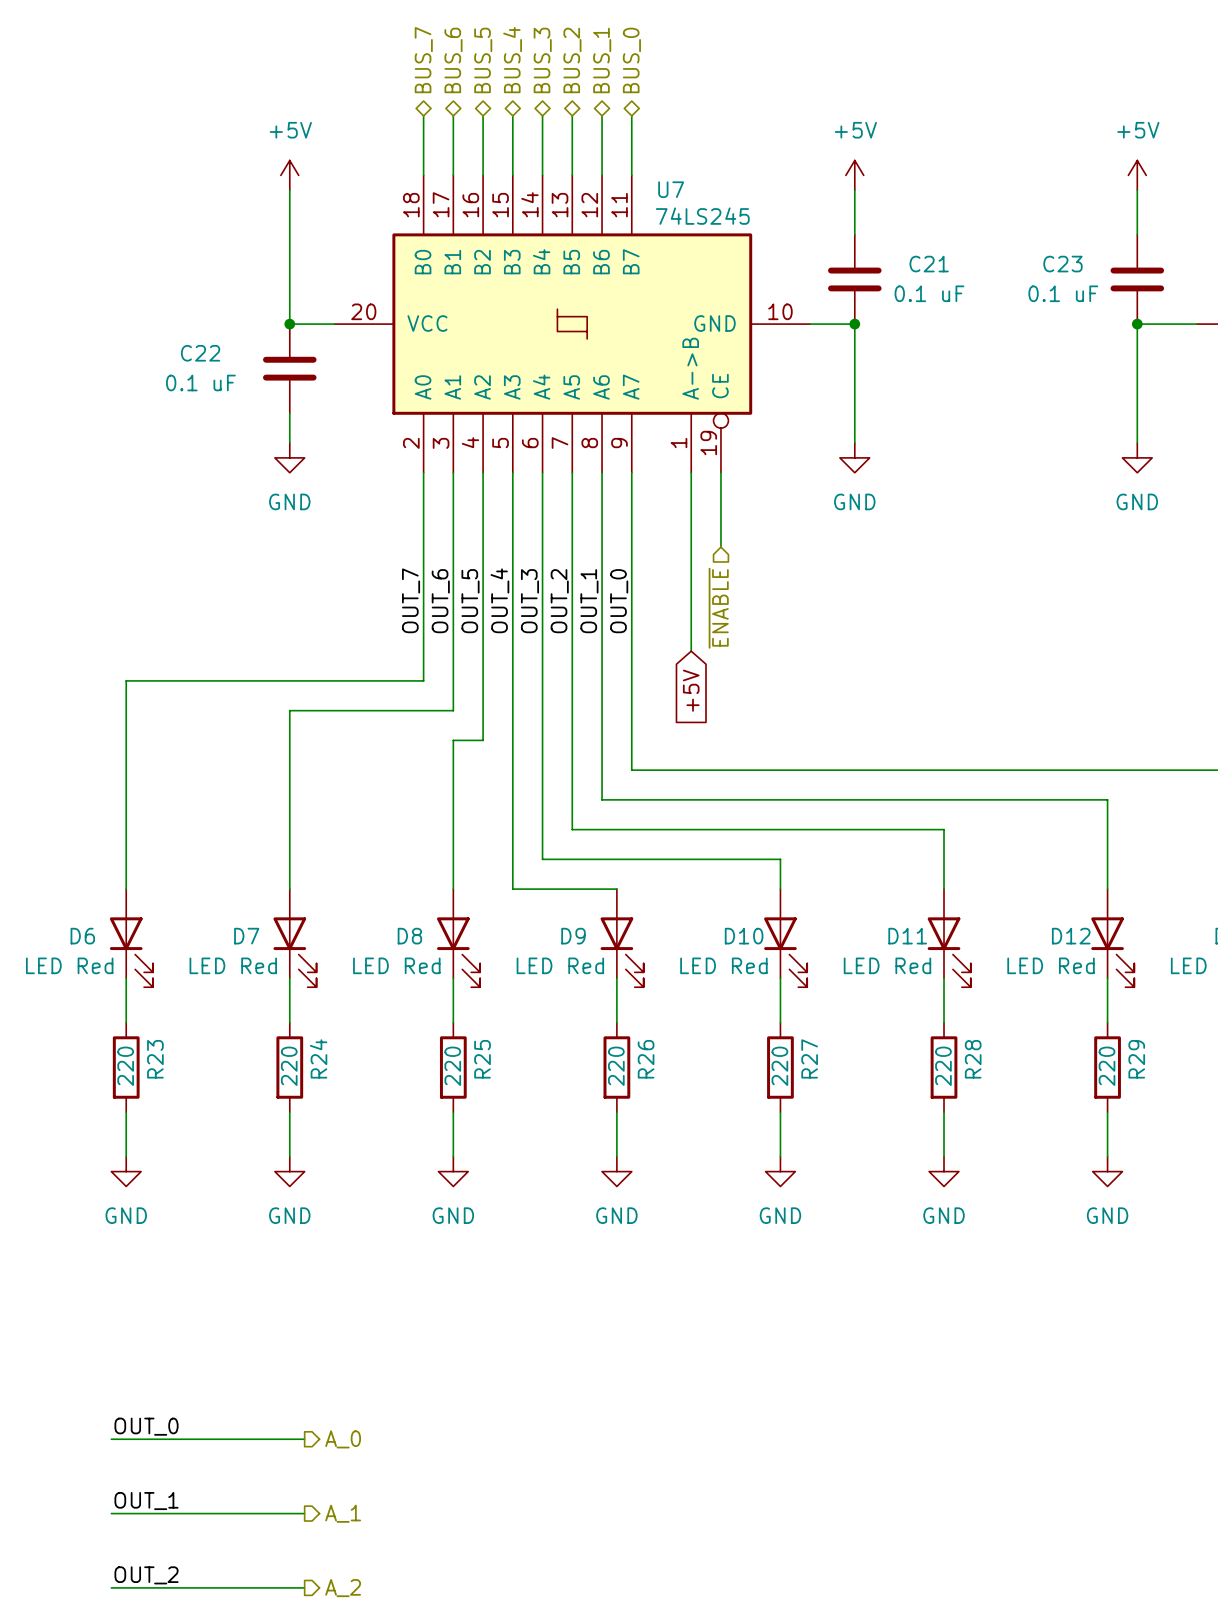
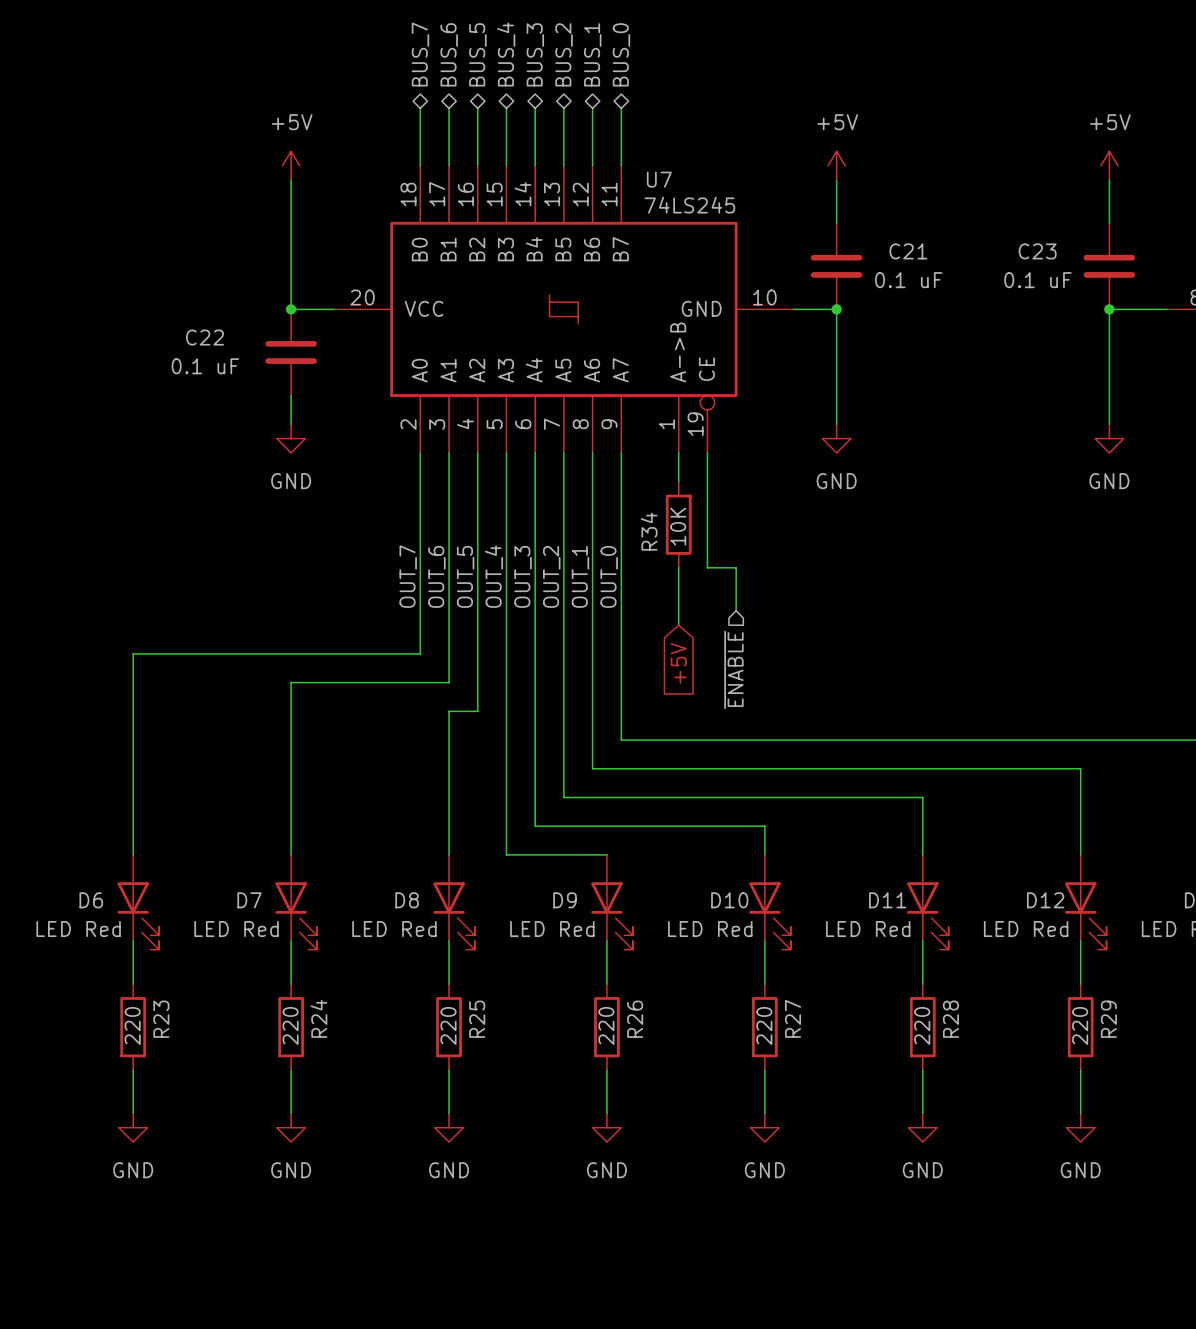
wire: (691, 502) (691, 591) -> none
R34: none -> 10K (678, 524)
wire: none -> (707, 524) (707, 567) (736, 567) (736, 610)
hierarchical label position: ~{ENABLE} (718, 608) -> ~{ENABLE} (733, 669)

